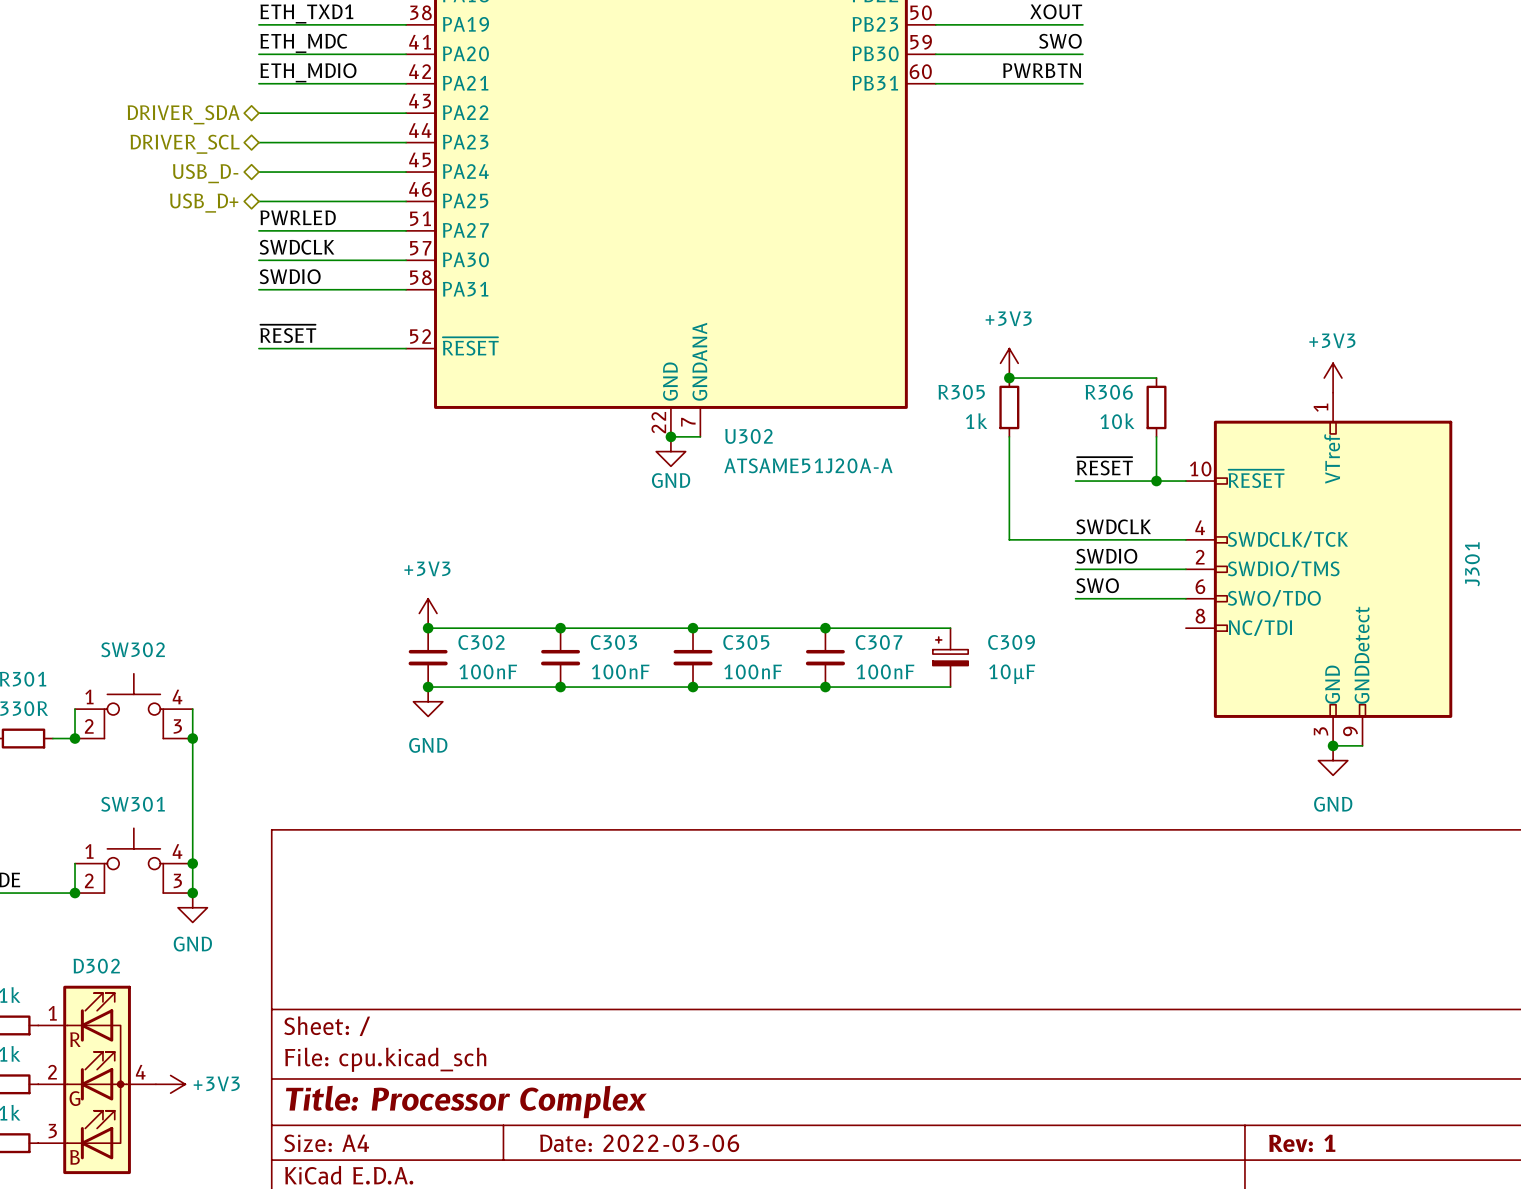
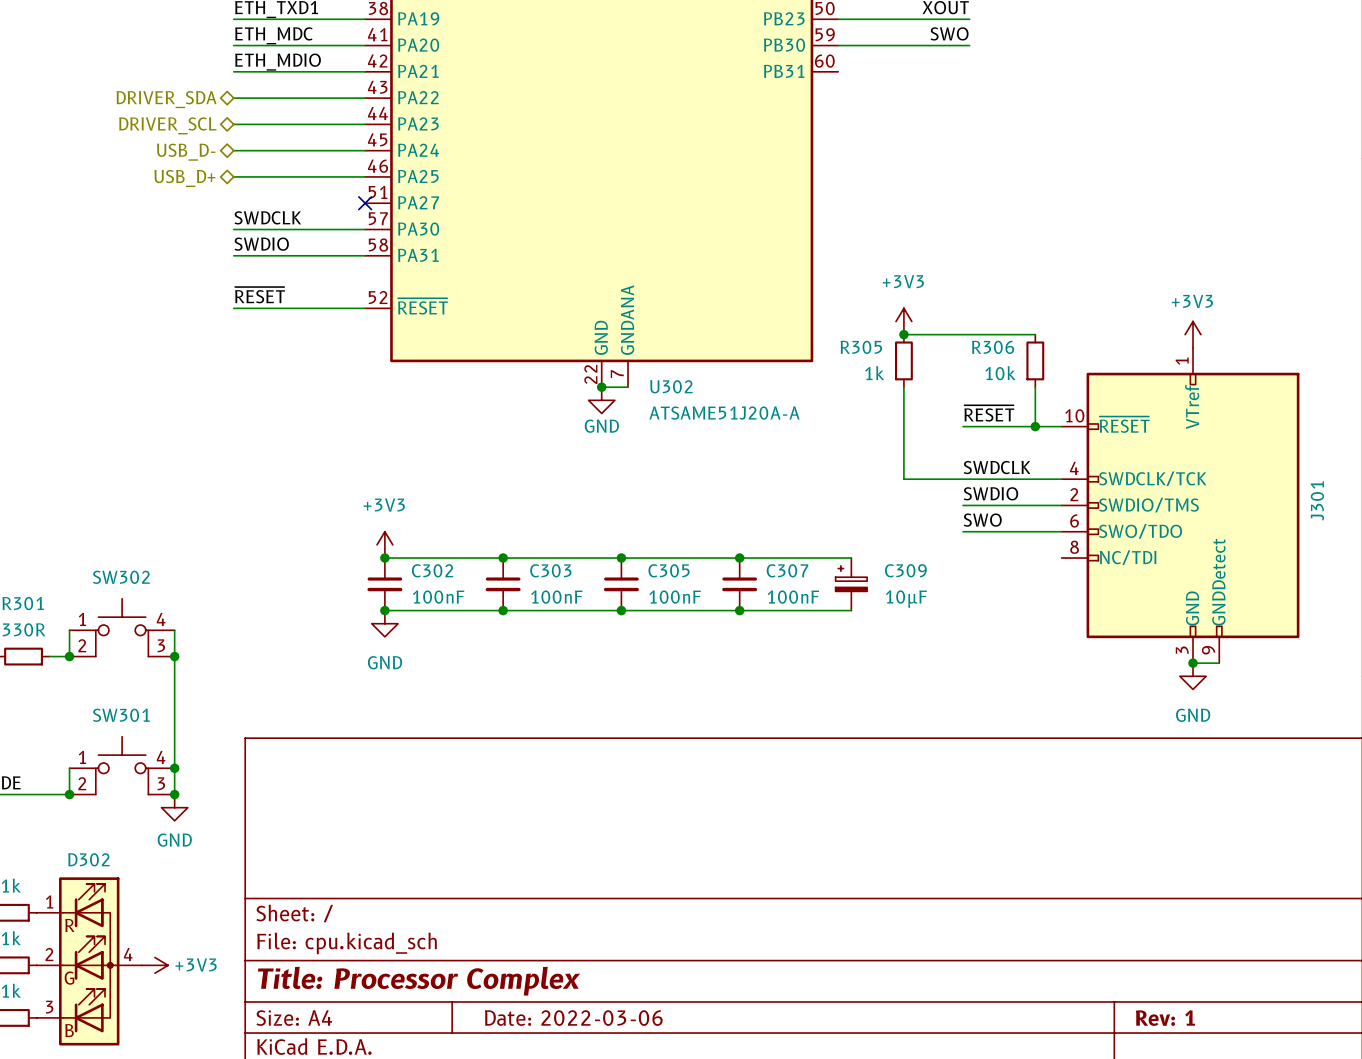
label: PWRBTN (1042, 70) -> none
wire: (935, 83) (1082, 83) -> none
label: PWRLED (298, 217) -> none
wire: (258, 230) (406, 230) -> none
no-connect mark: none -> (365, 203)

